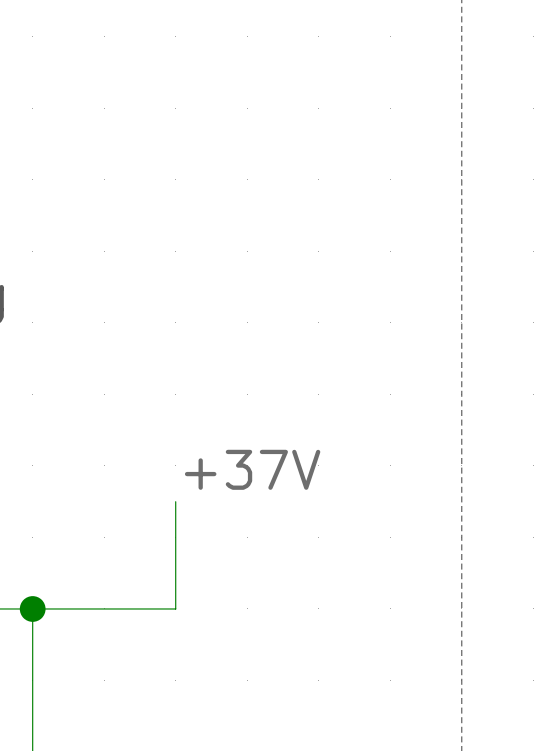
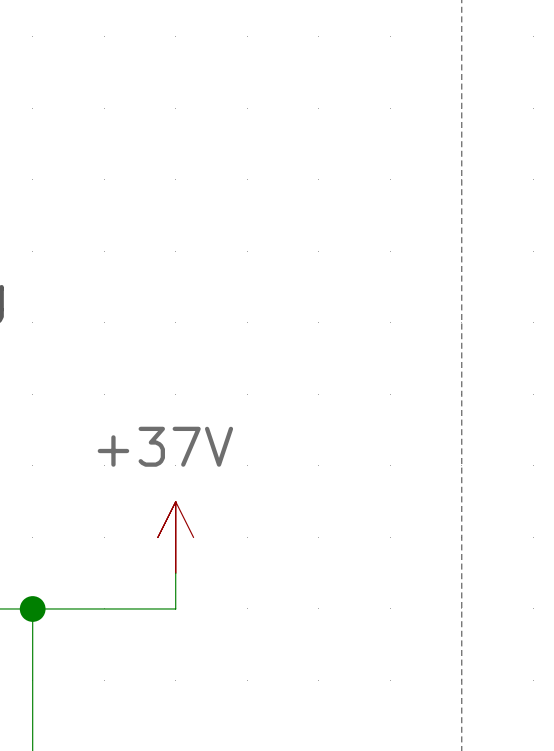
label: +37V (252, 469) -> none
power symbol: none -> +37V (175, 537)

